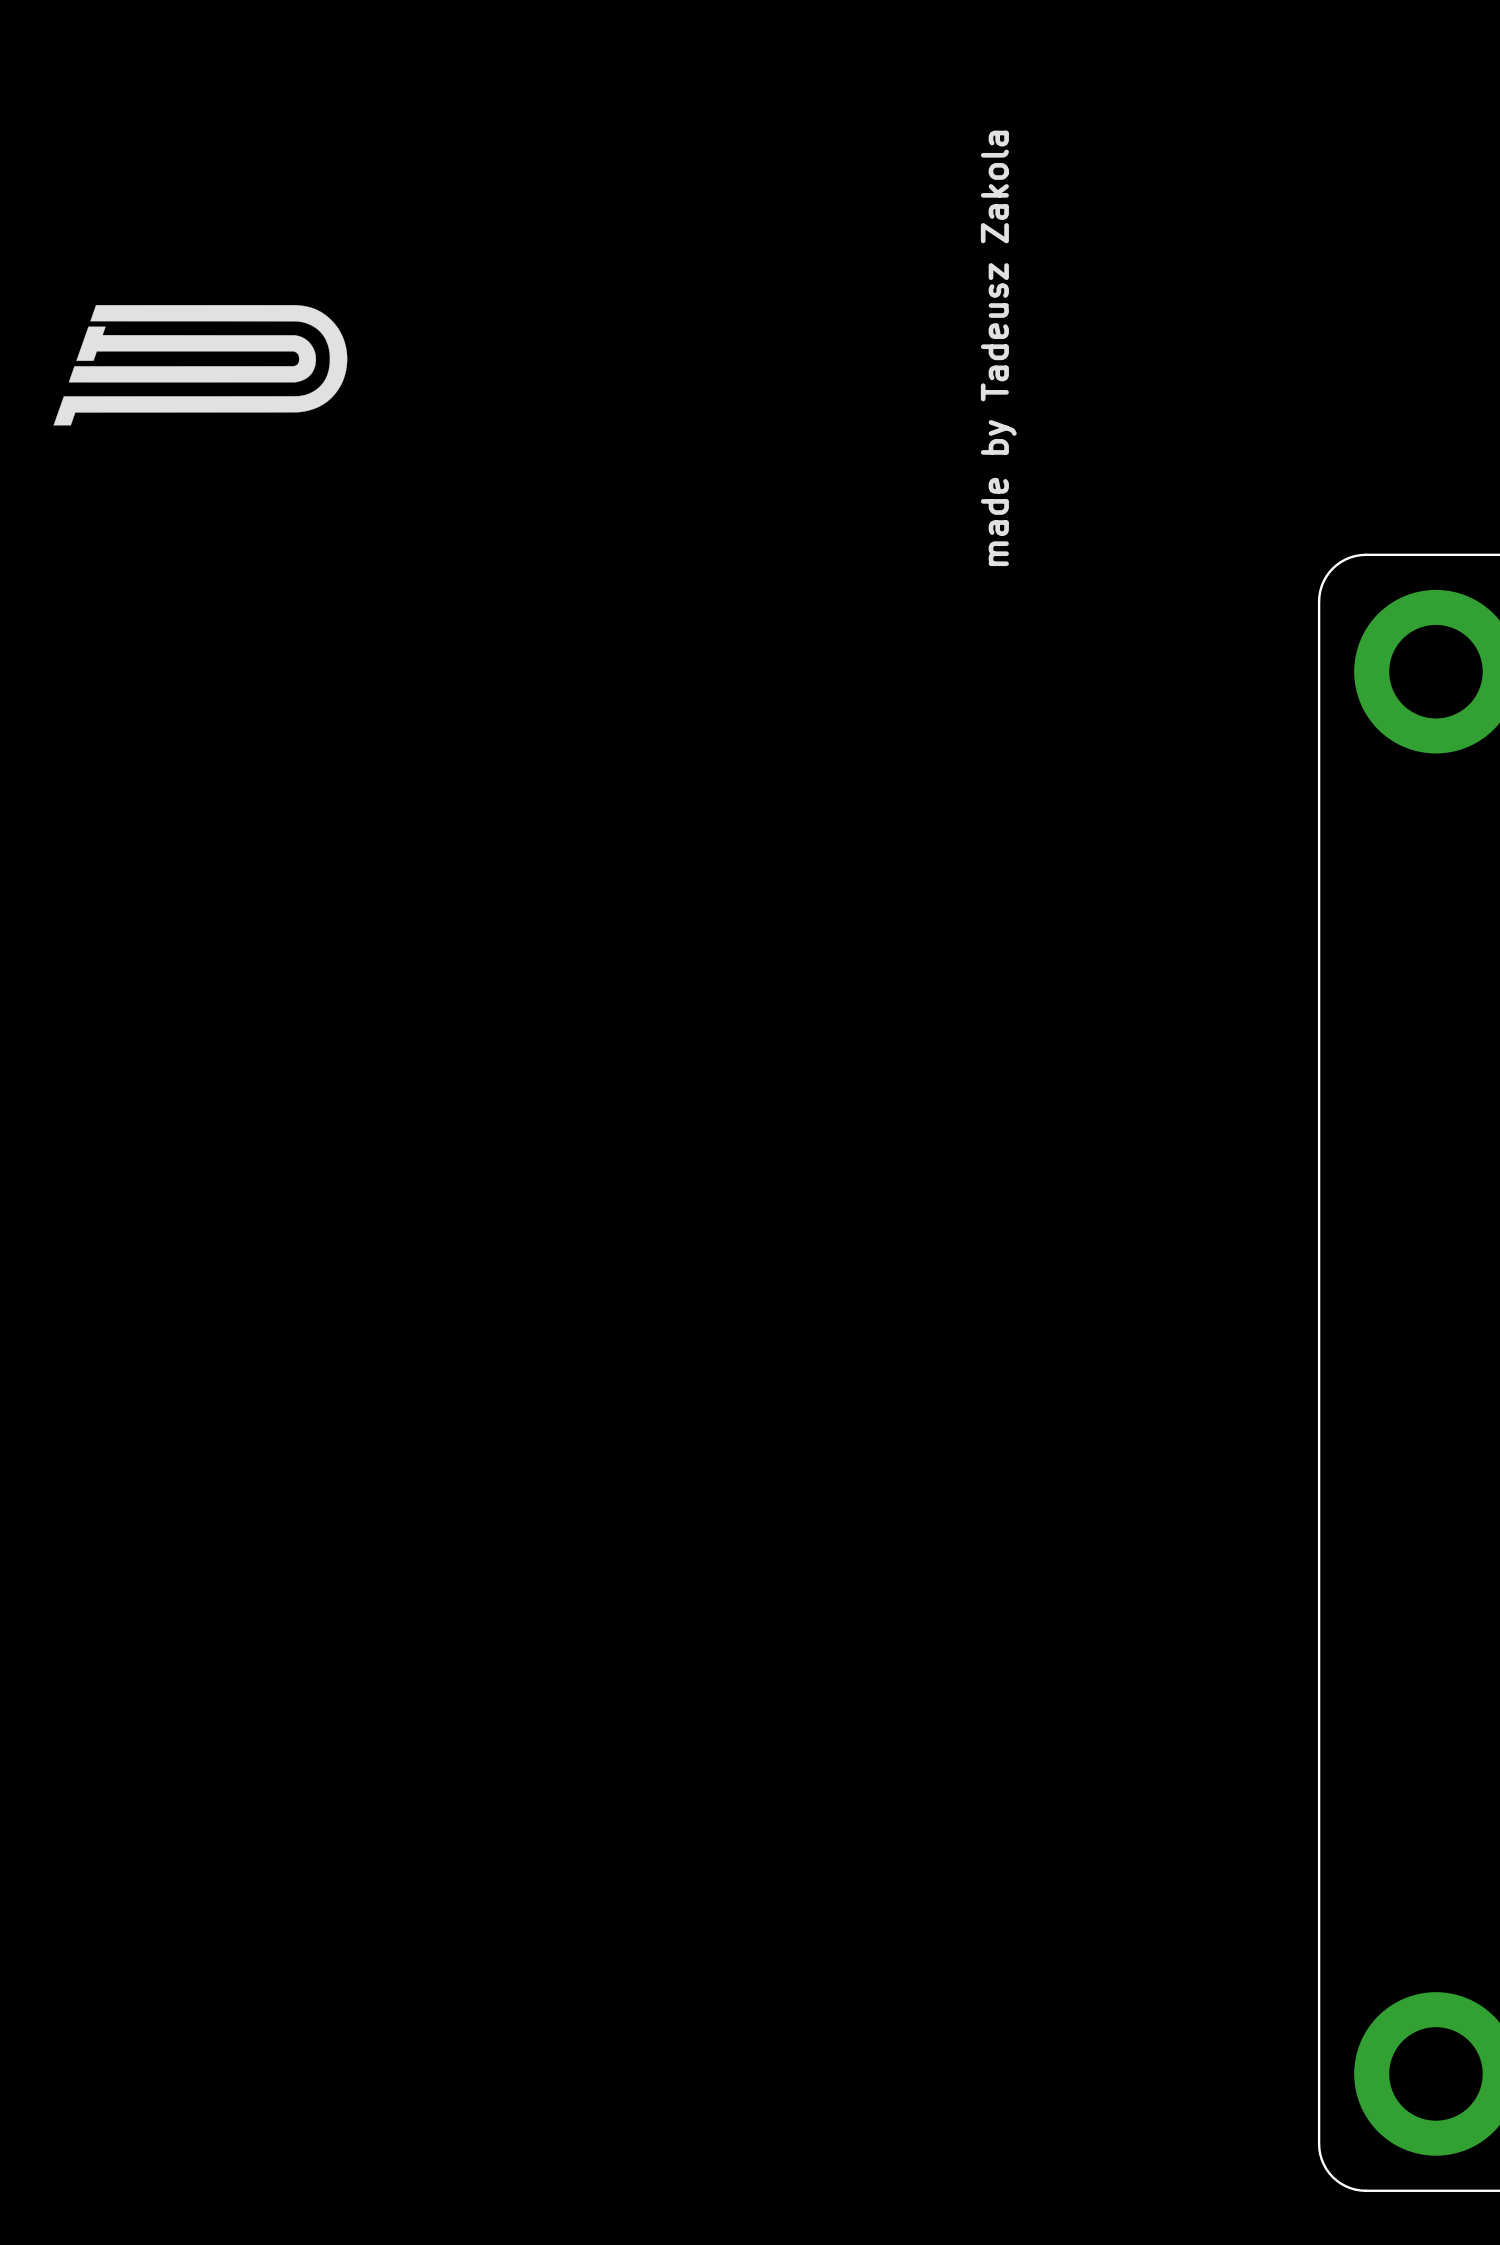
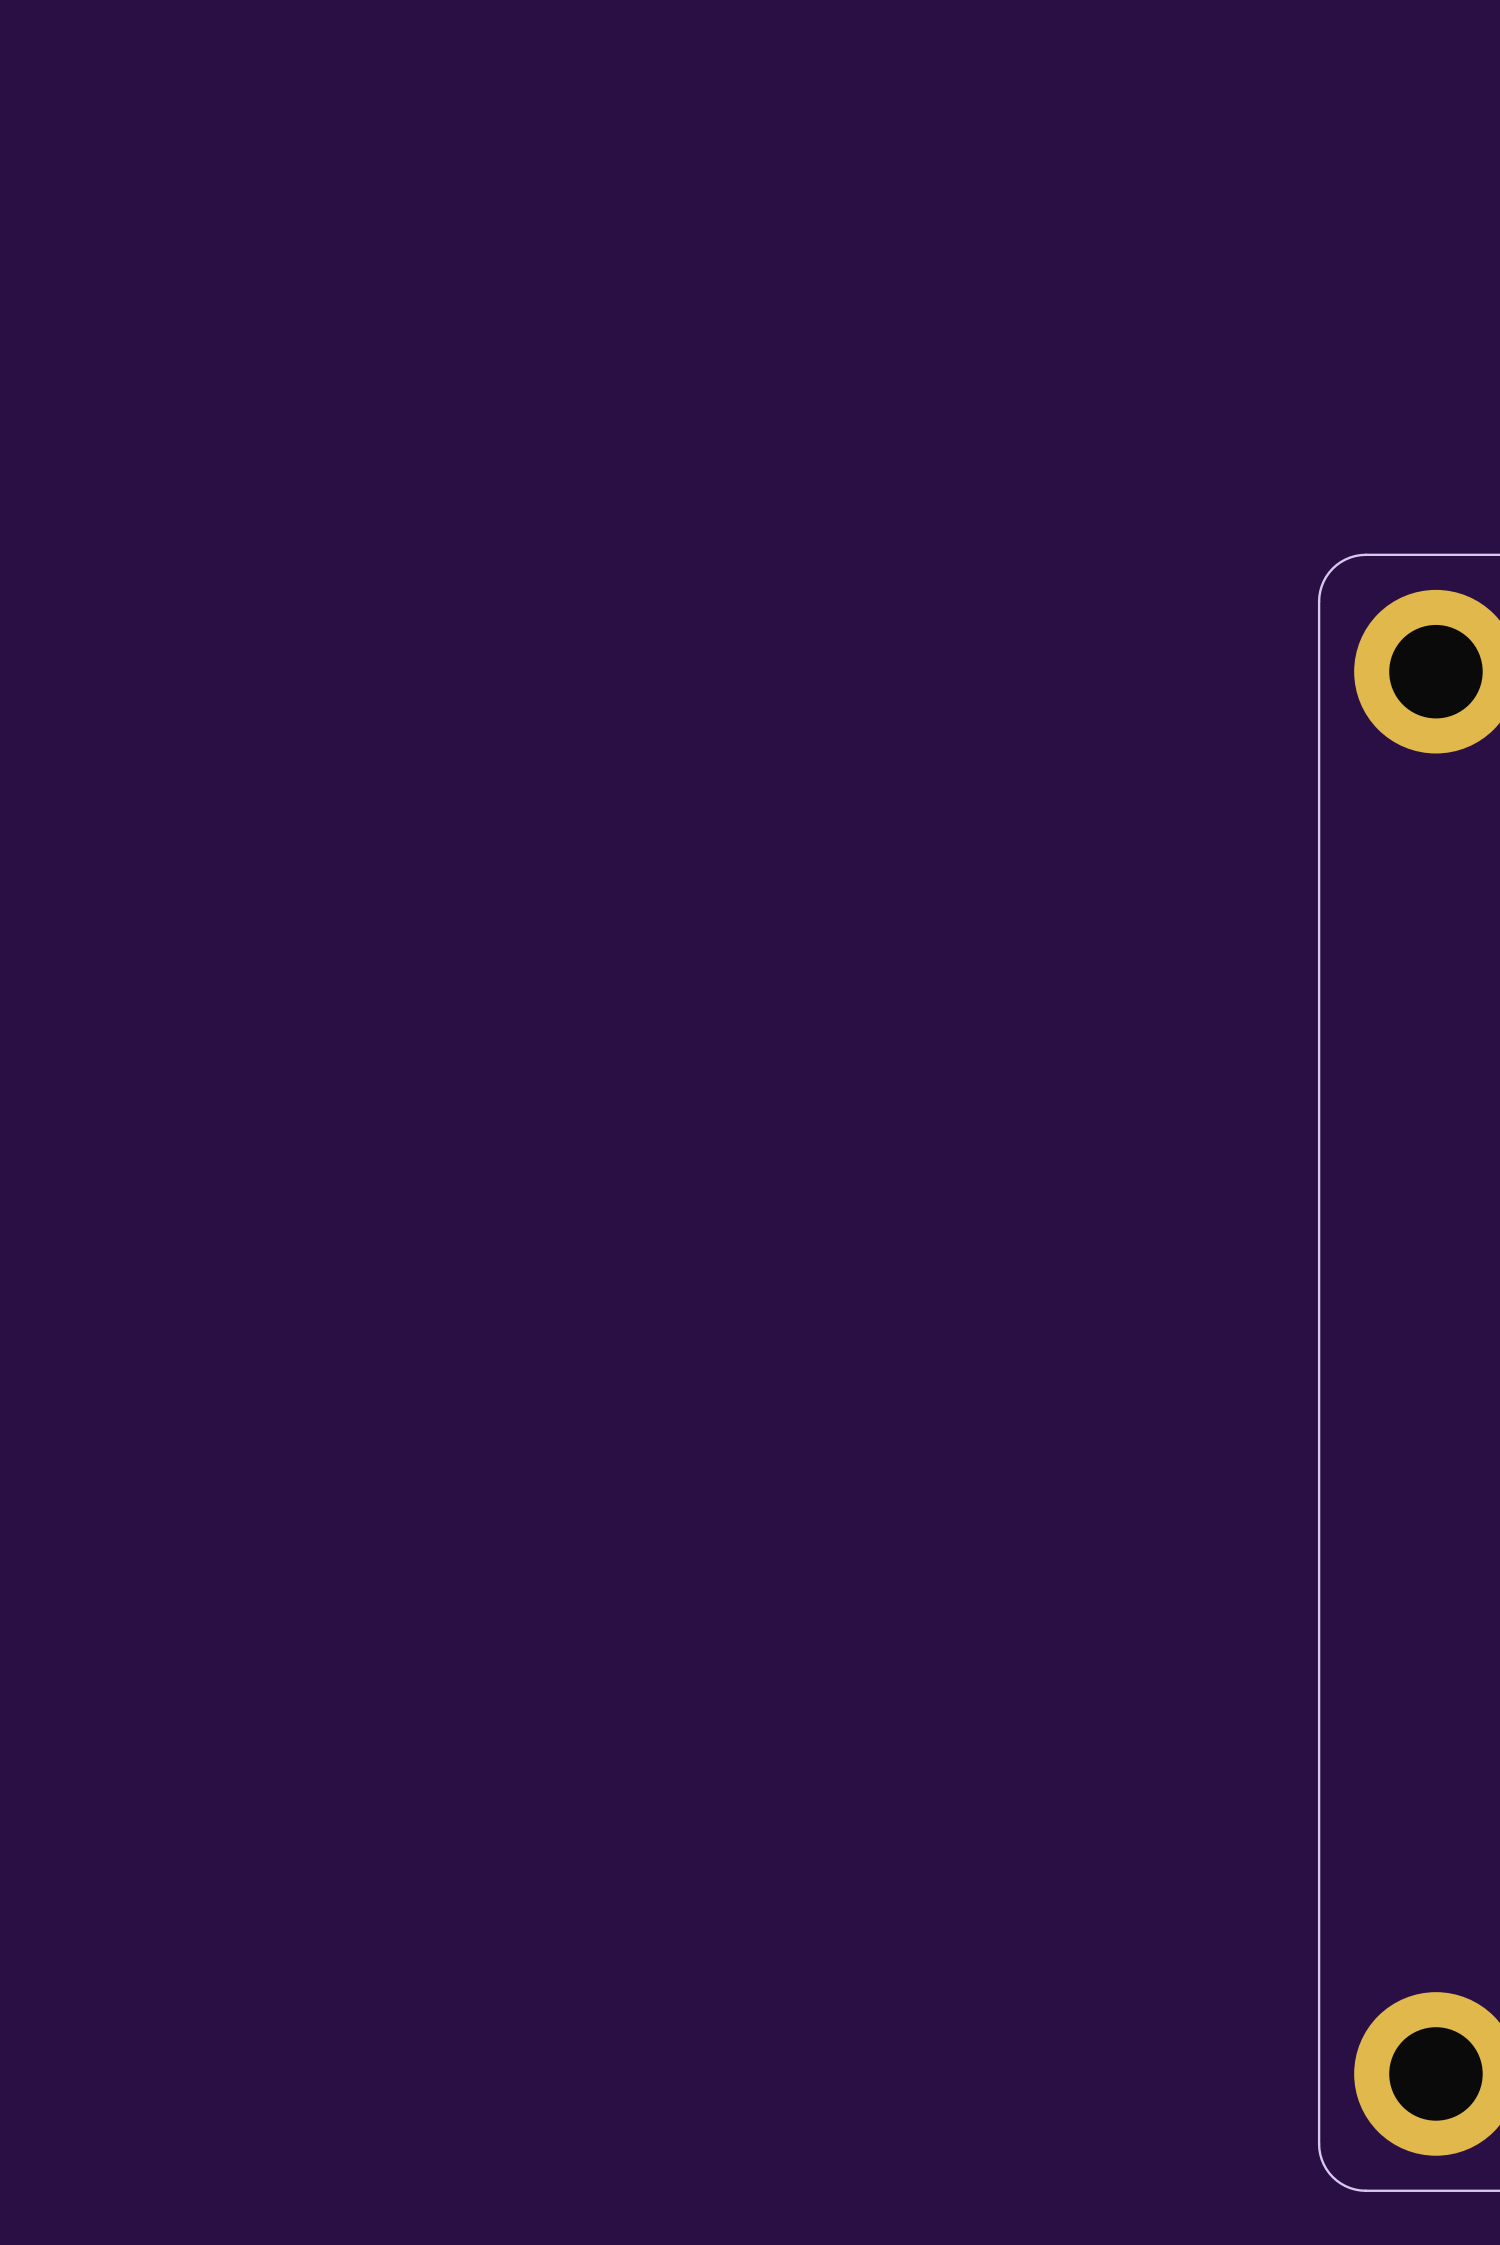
drawing: [53, 305, 348, 426] -> none
text: made by Tadeusz Zakola (998, 348) -> none

